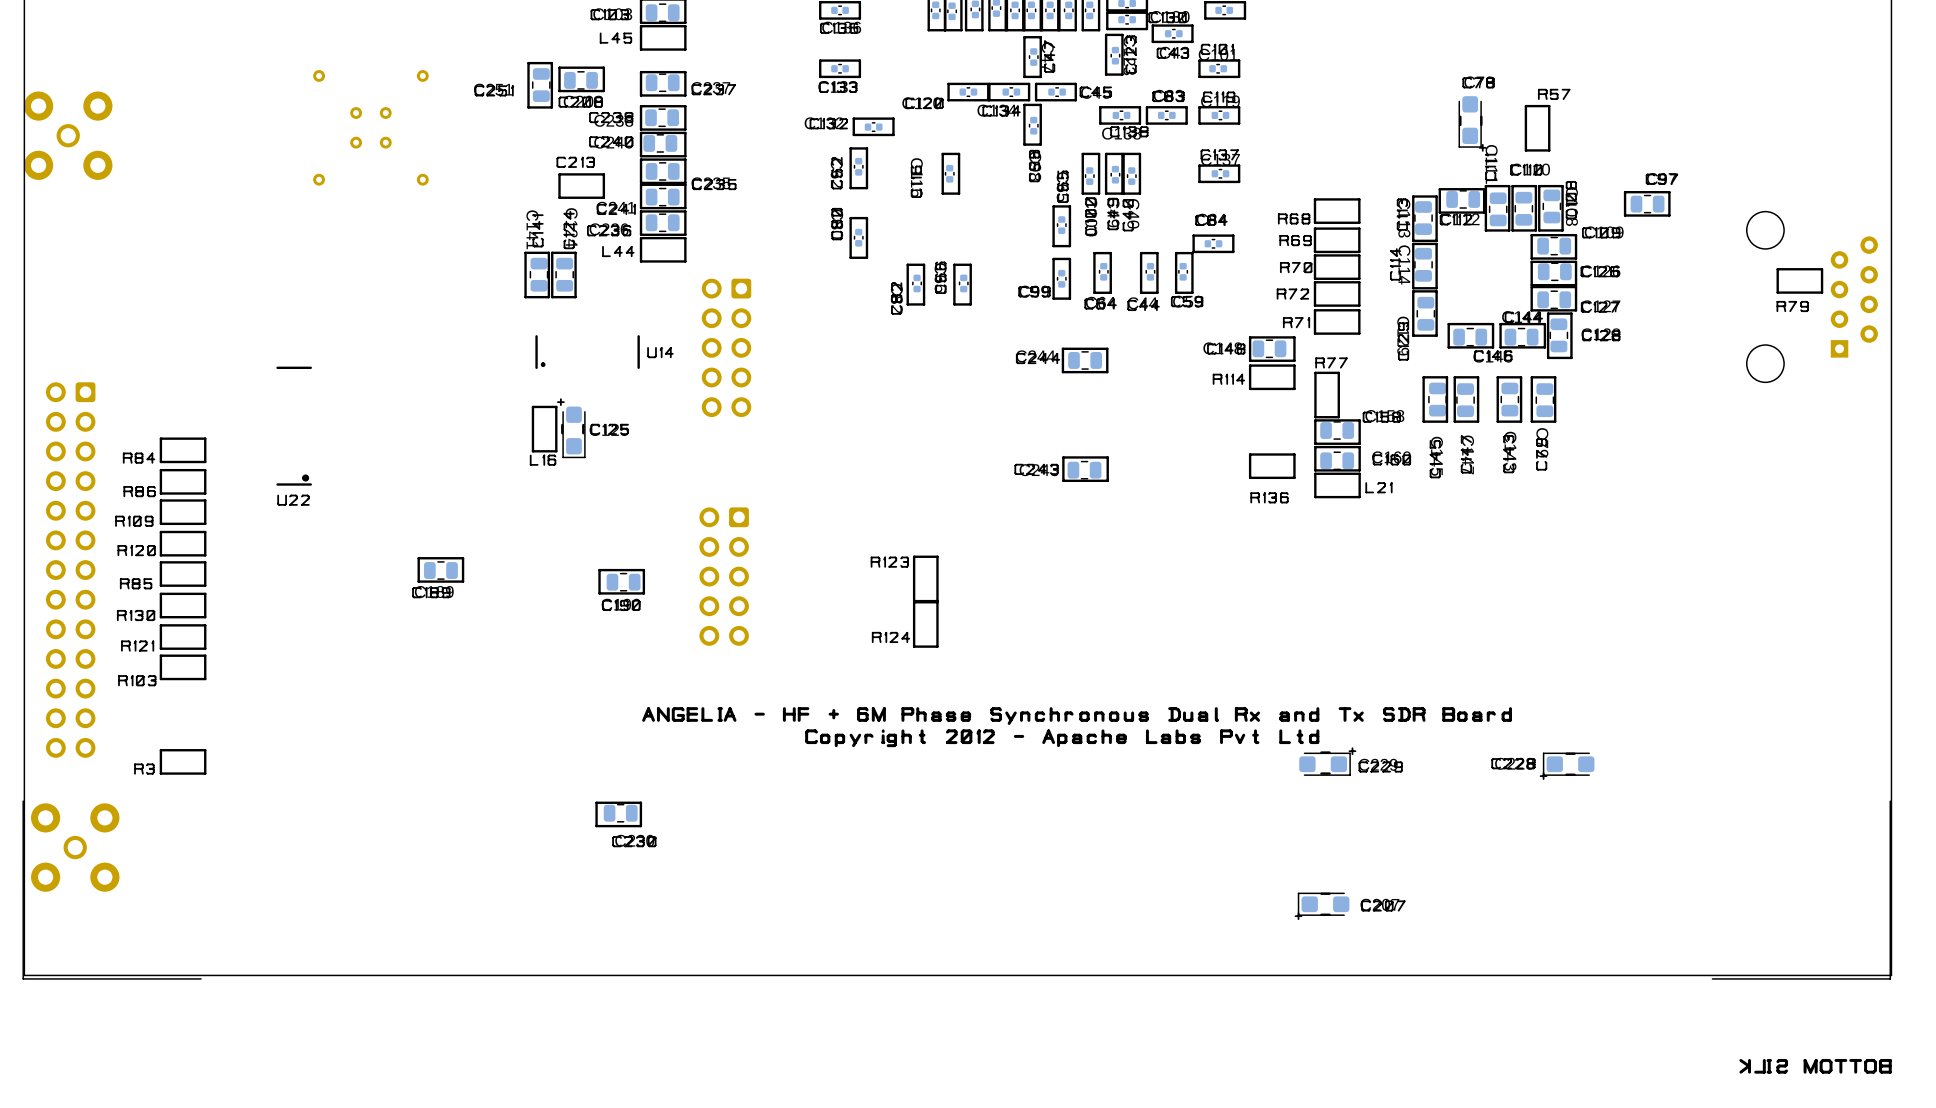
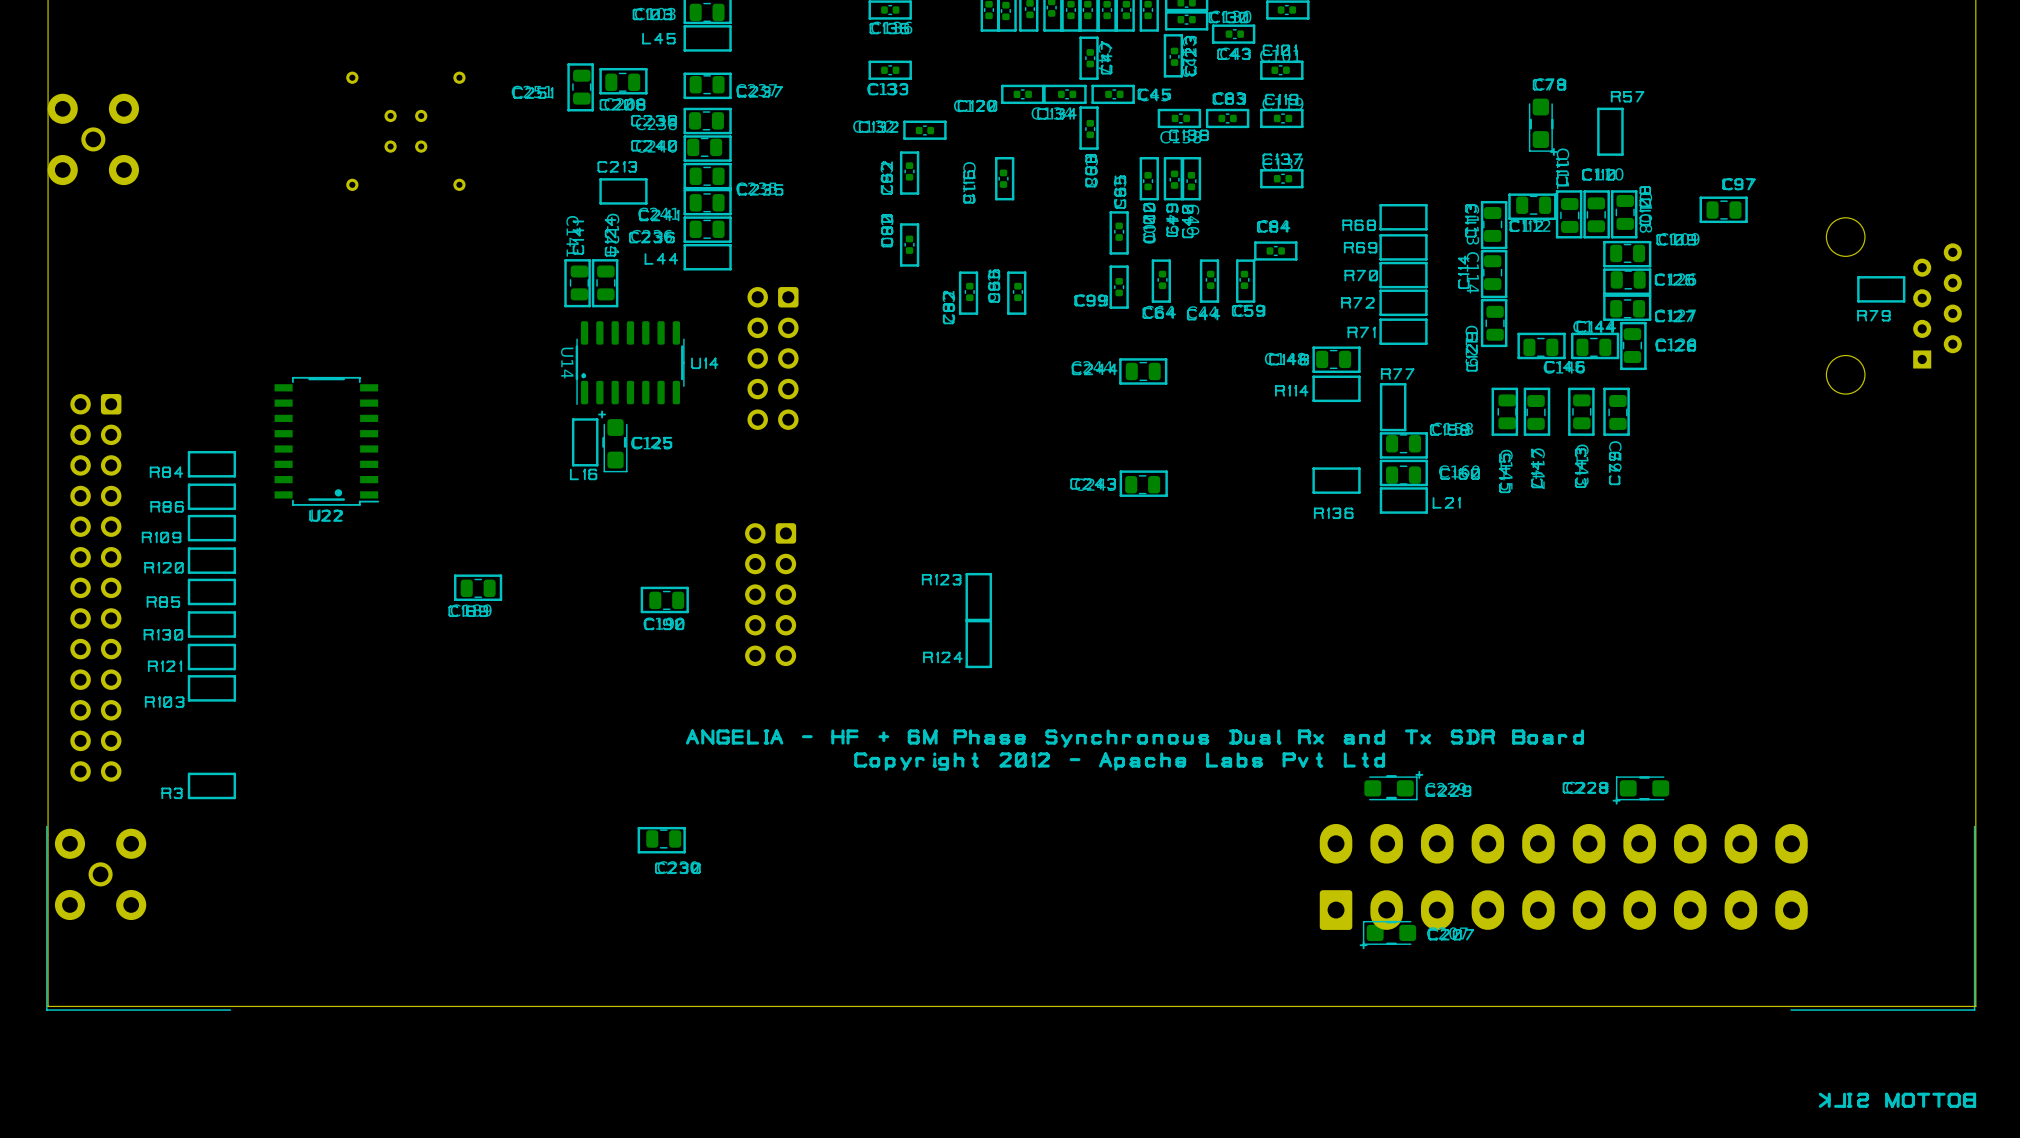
U14: none -> (630, 363)
part: none -> (326, 441)
part: none -> (1563, 876)

